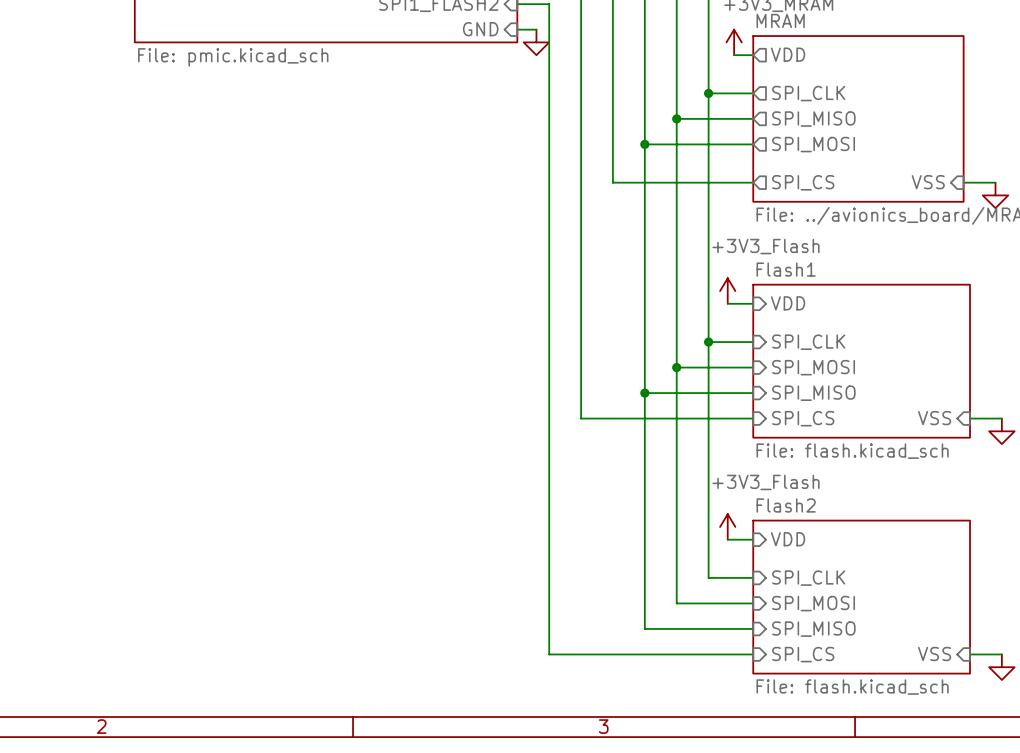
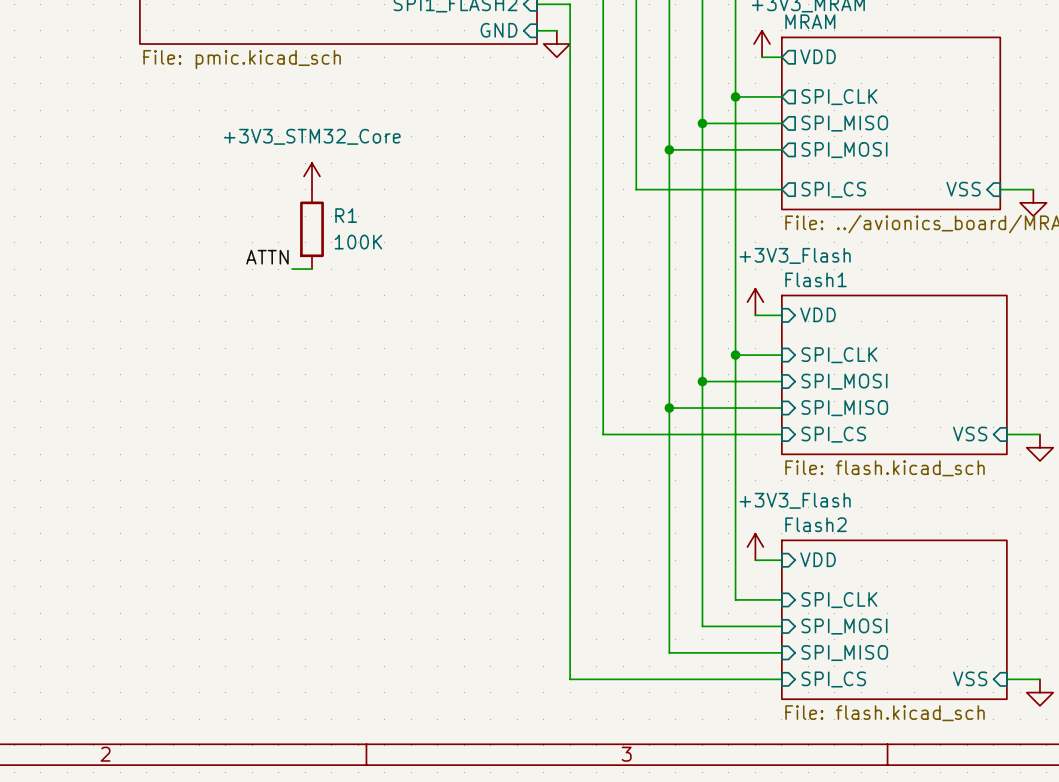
power symbol: none -> +3V3_STM32_Core (311, 176)
R1: none -> 100K (311, 229)
label: none -> ATTN (267, 257)
wire: none -> (292, 269) (311, 269)

